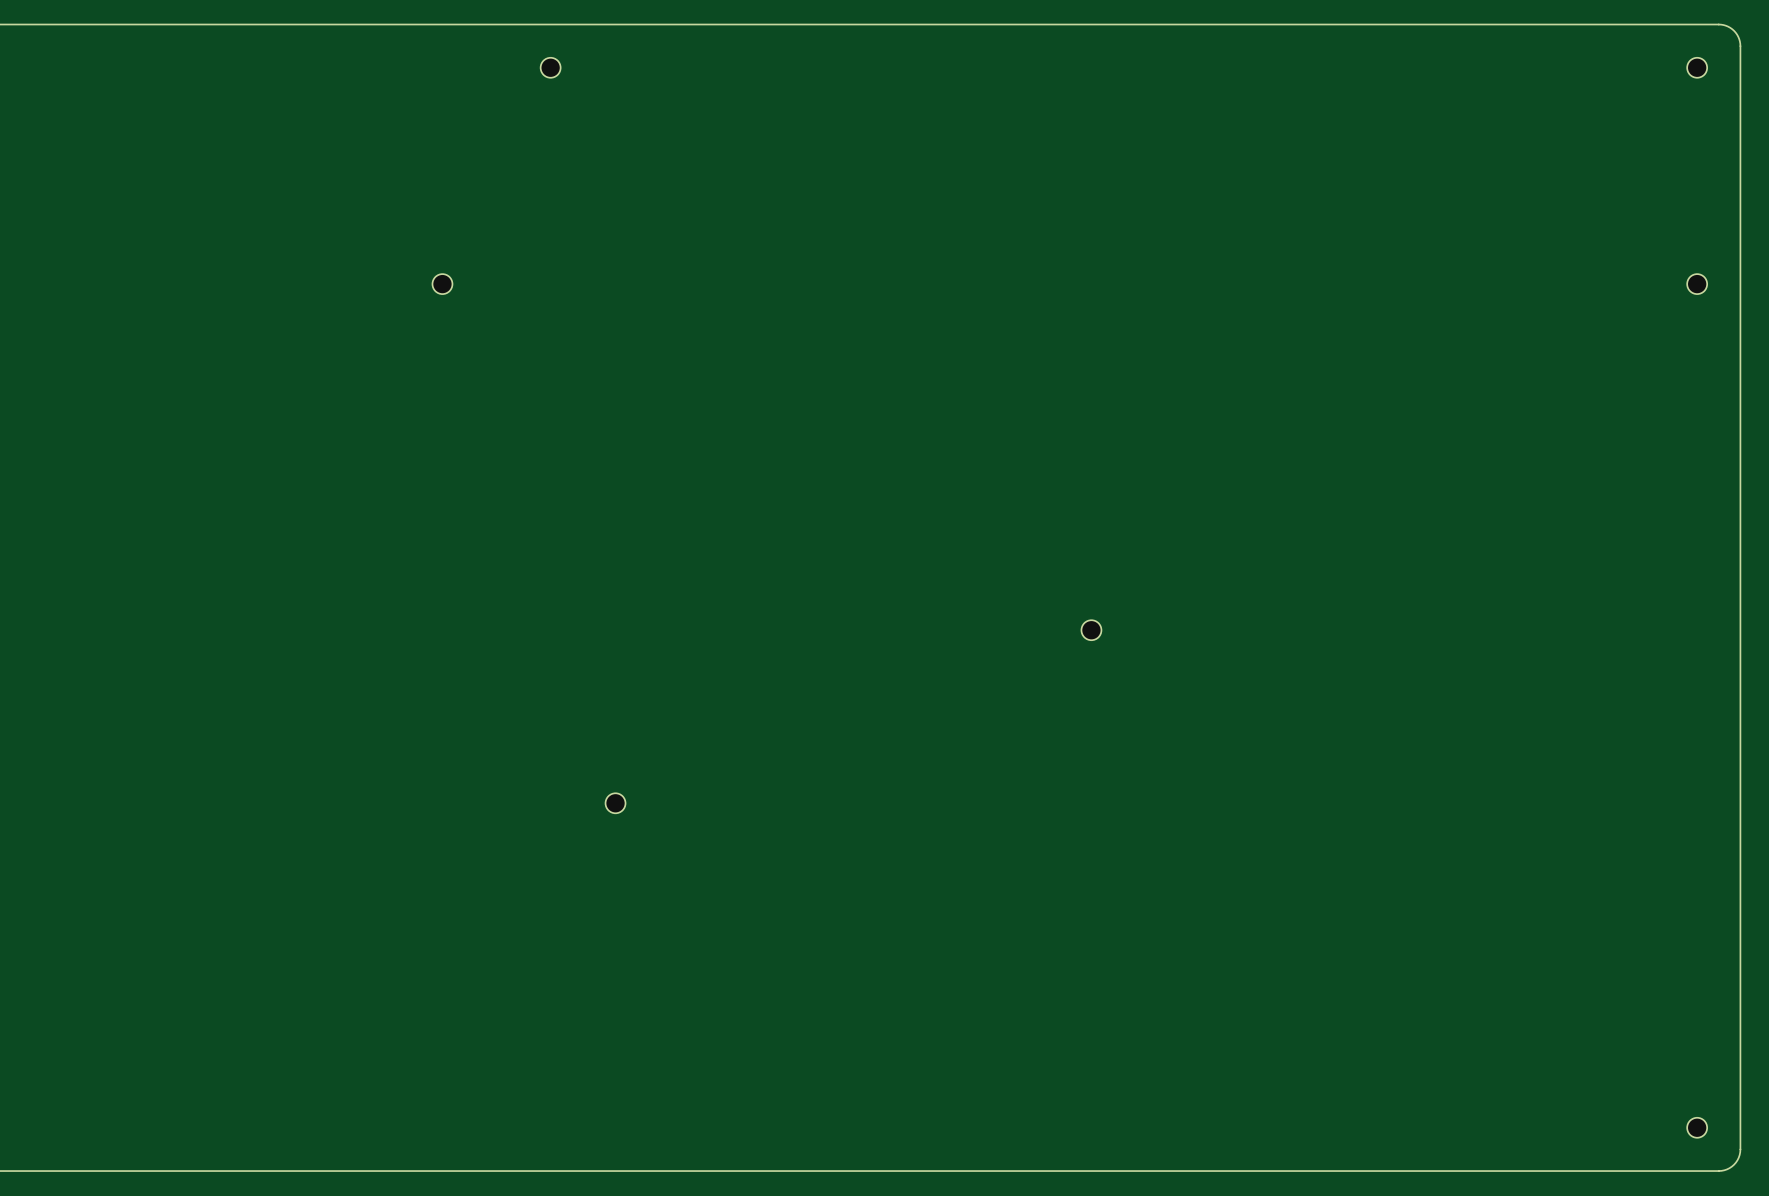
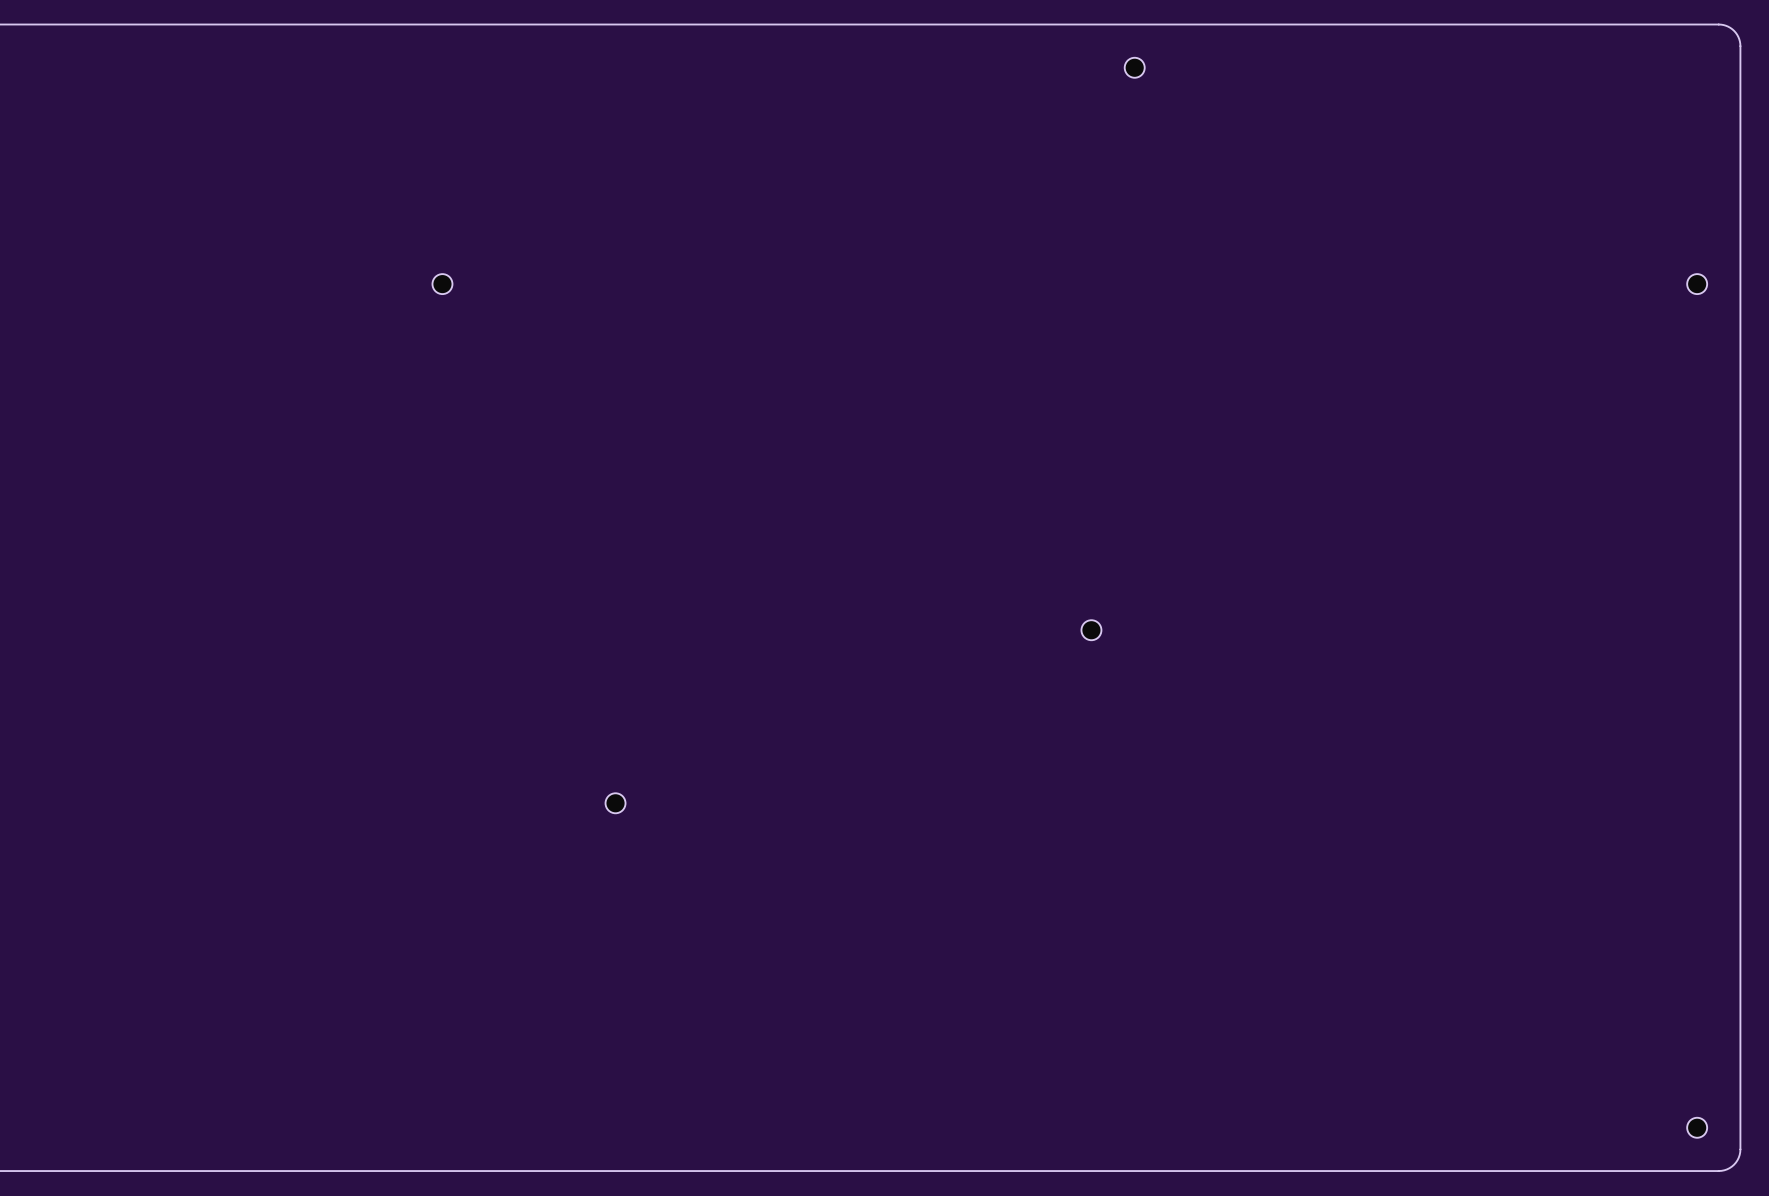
part: (550, 67) -> none
part: none -> (1134, 67)
part: (1697, 67) -> none

